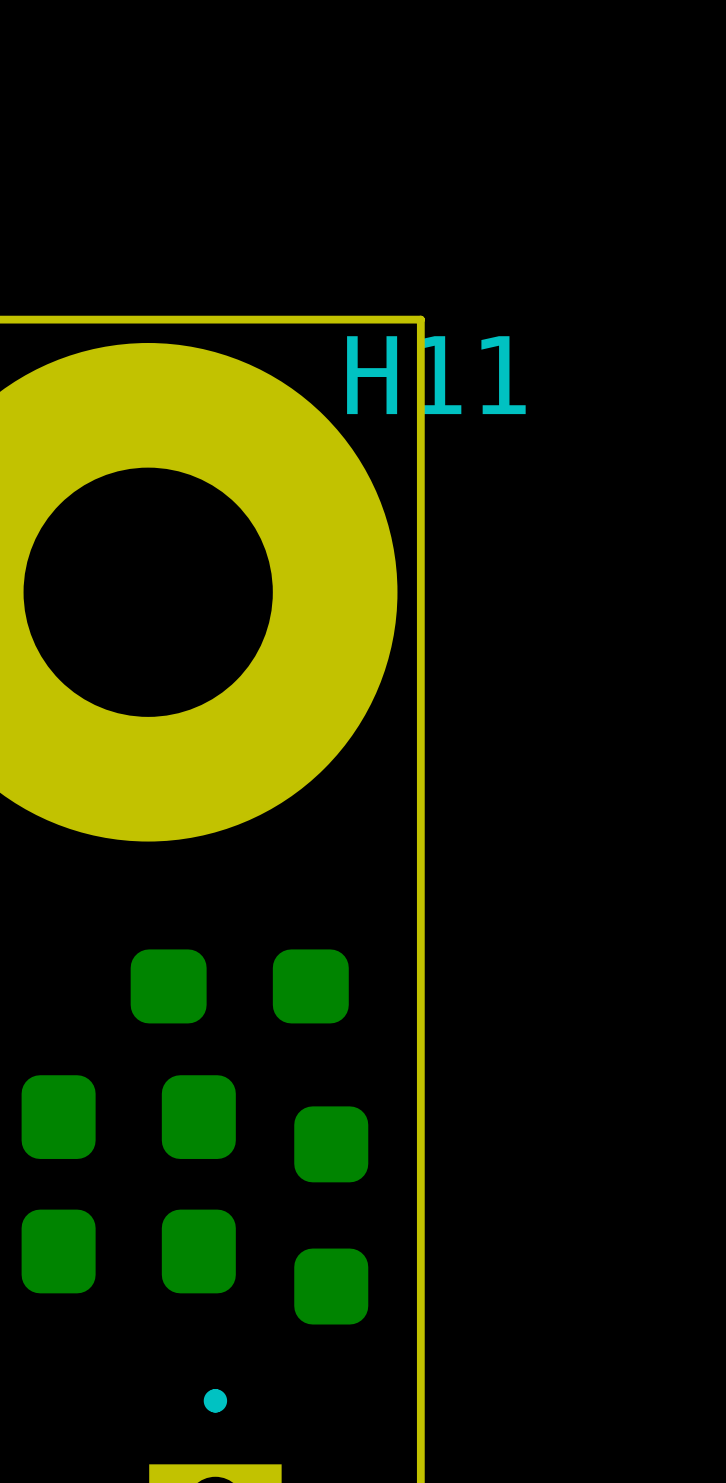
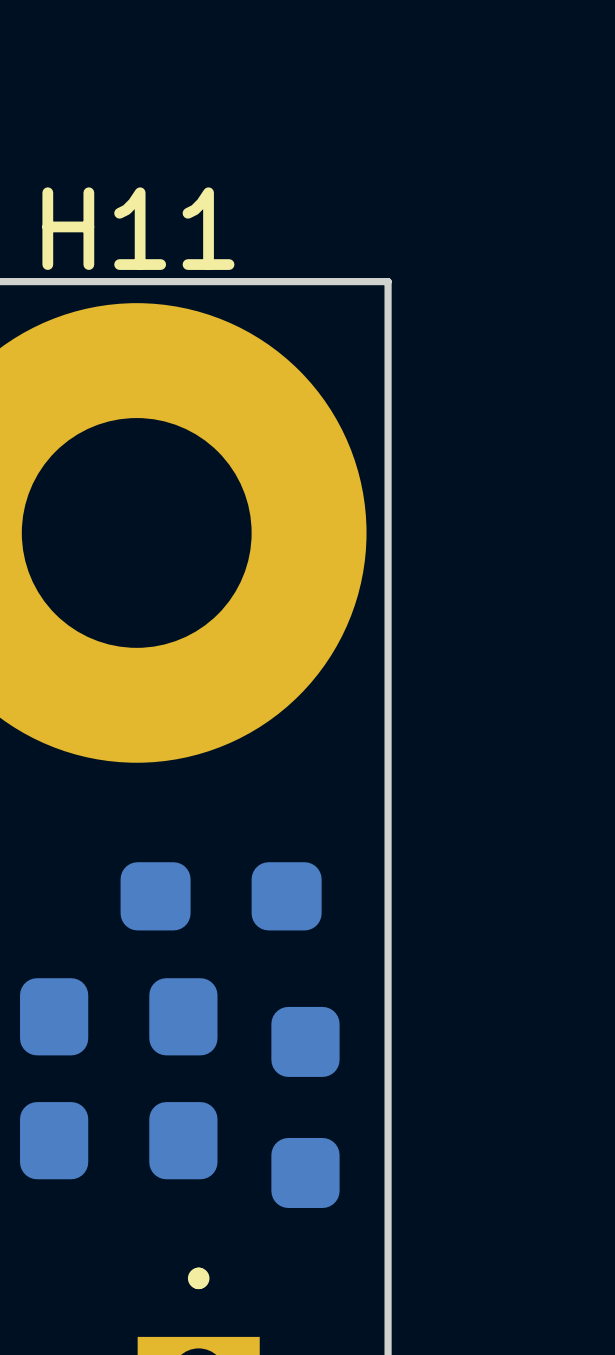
H11 name position: H11 (436, 375) -> H11 (138, 228)

